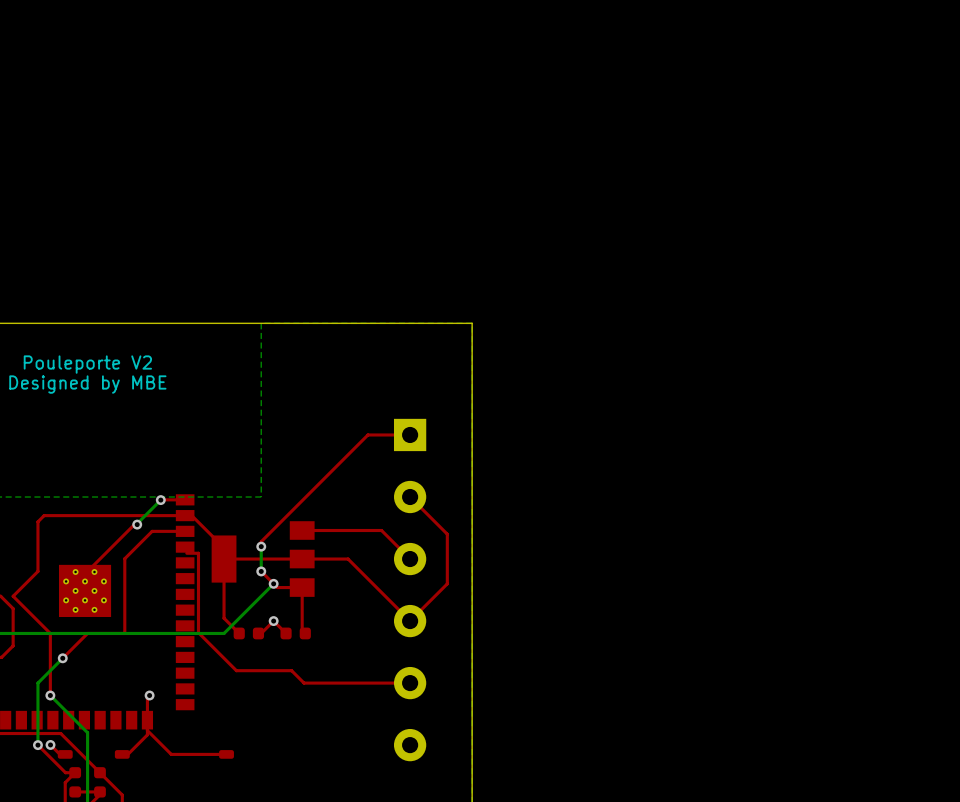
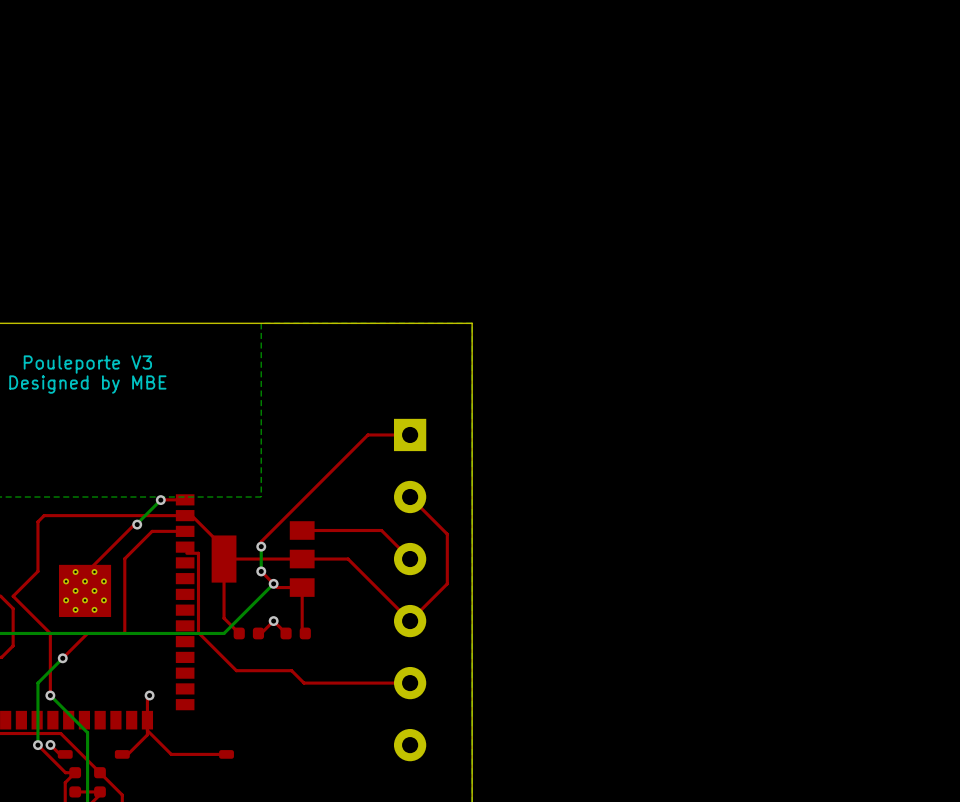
text: Pouleporte V2 (87, 364) -> Pouleporte V3 (87, 364)

